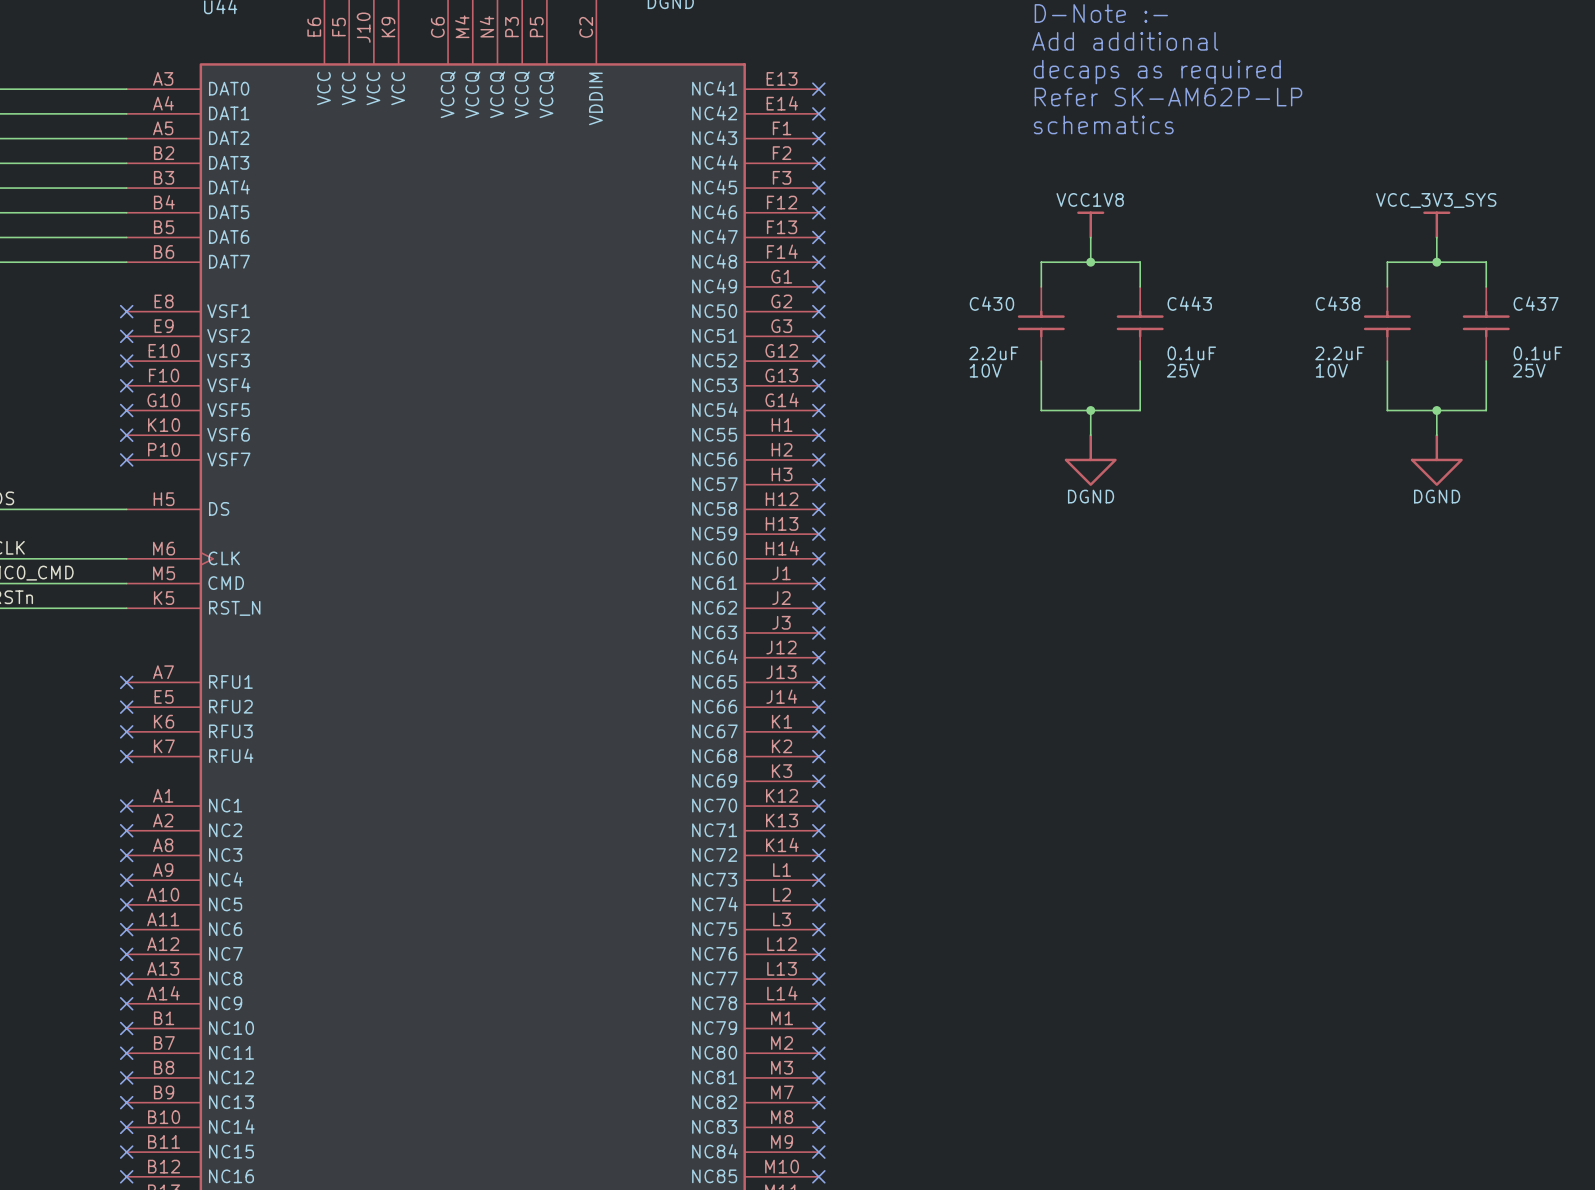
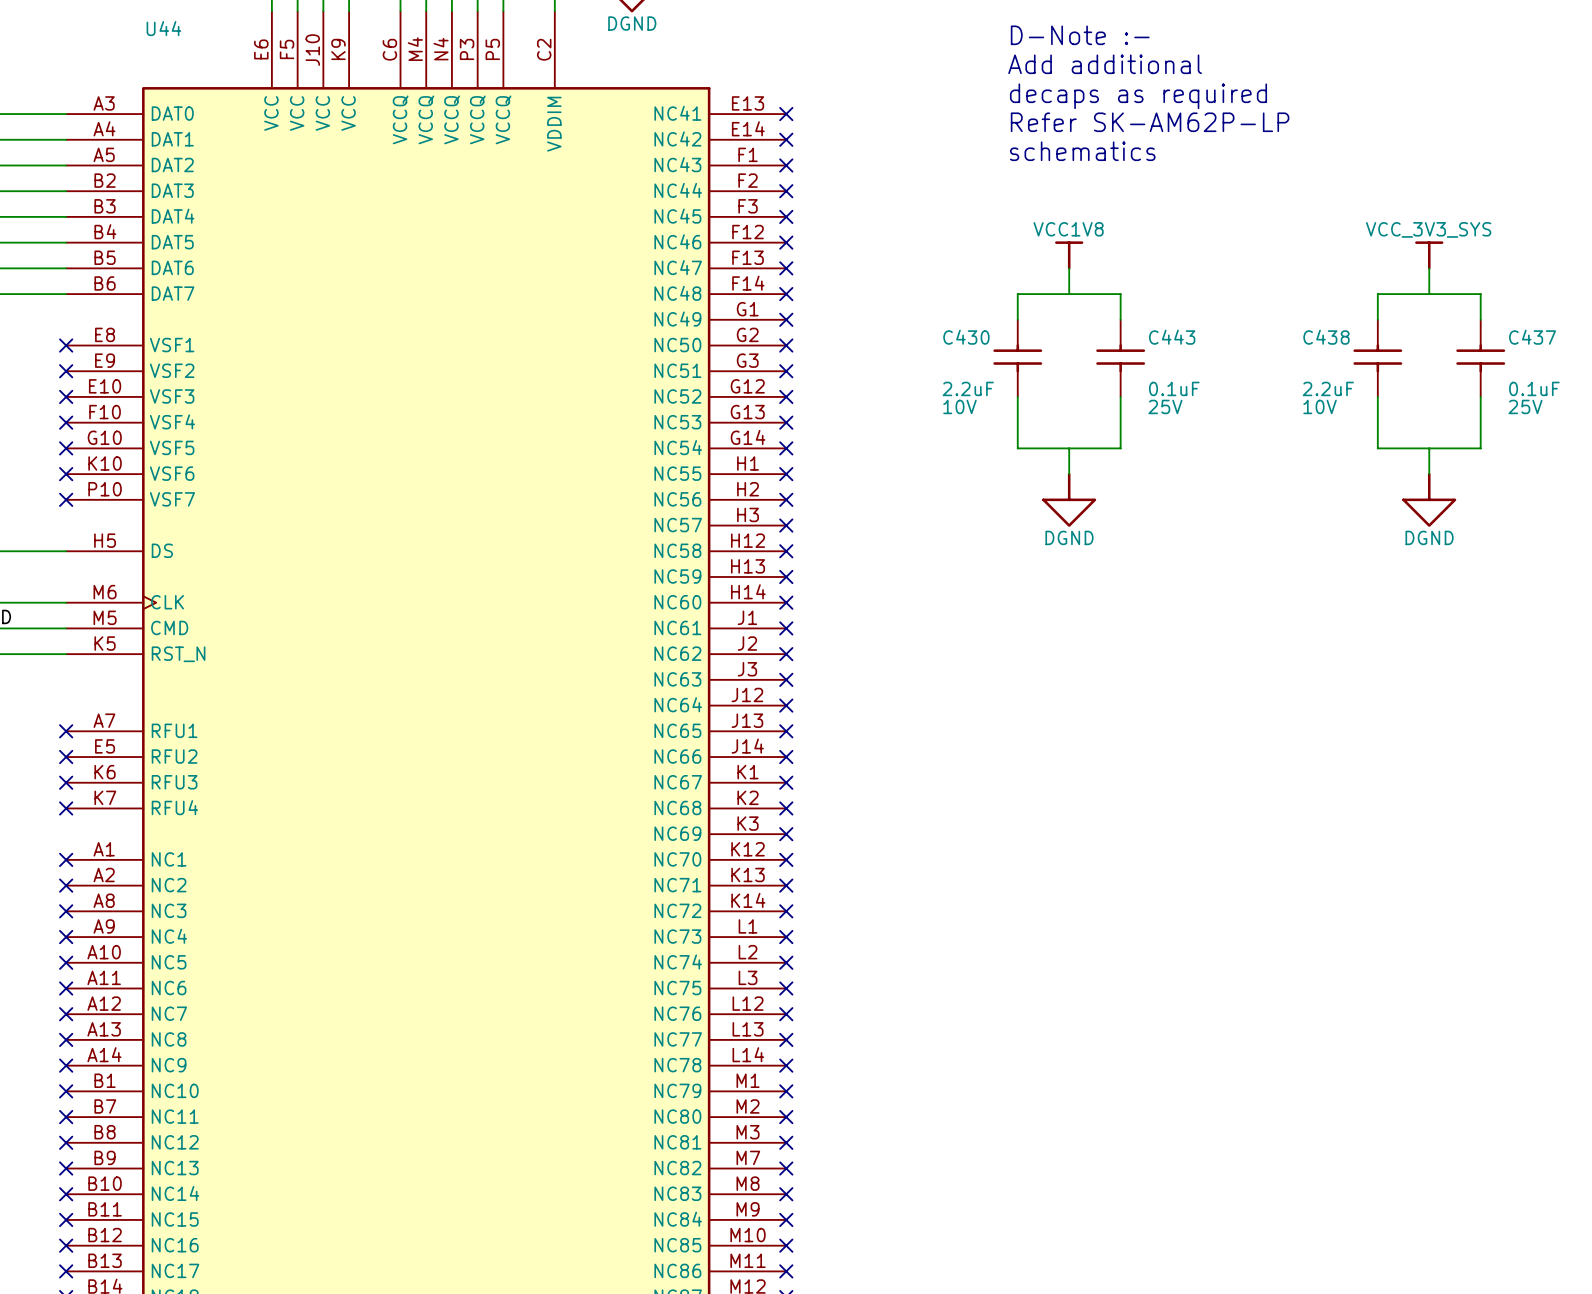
junction: (1090, 262) -> none
junction: (1436, 262) -> none
junction: (1090, 410) -> none
junction: (1436, 410) -> none

